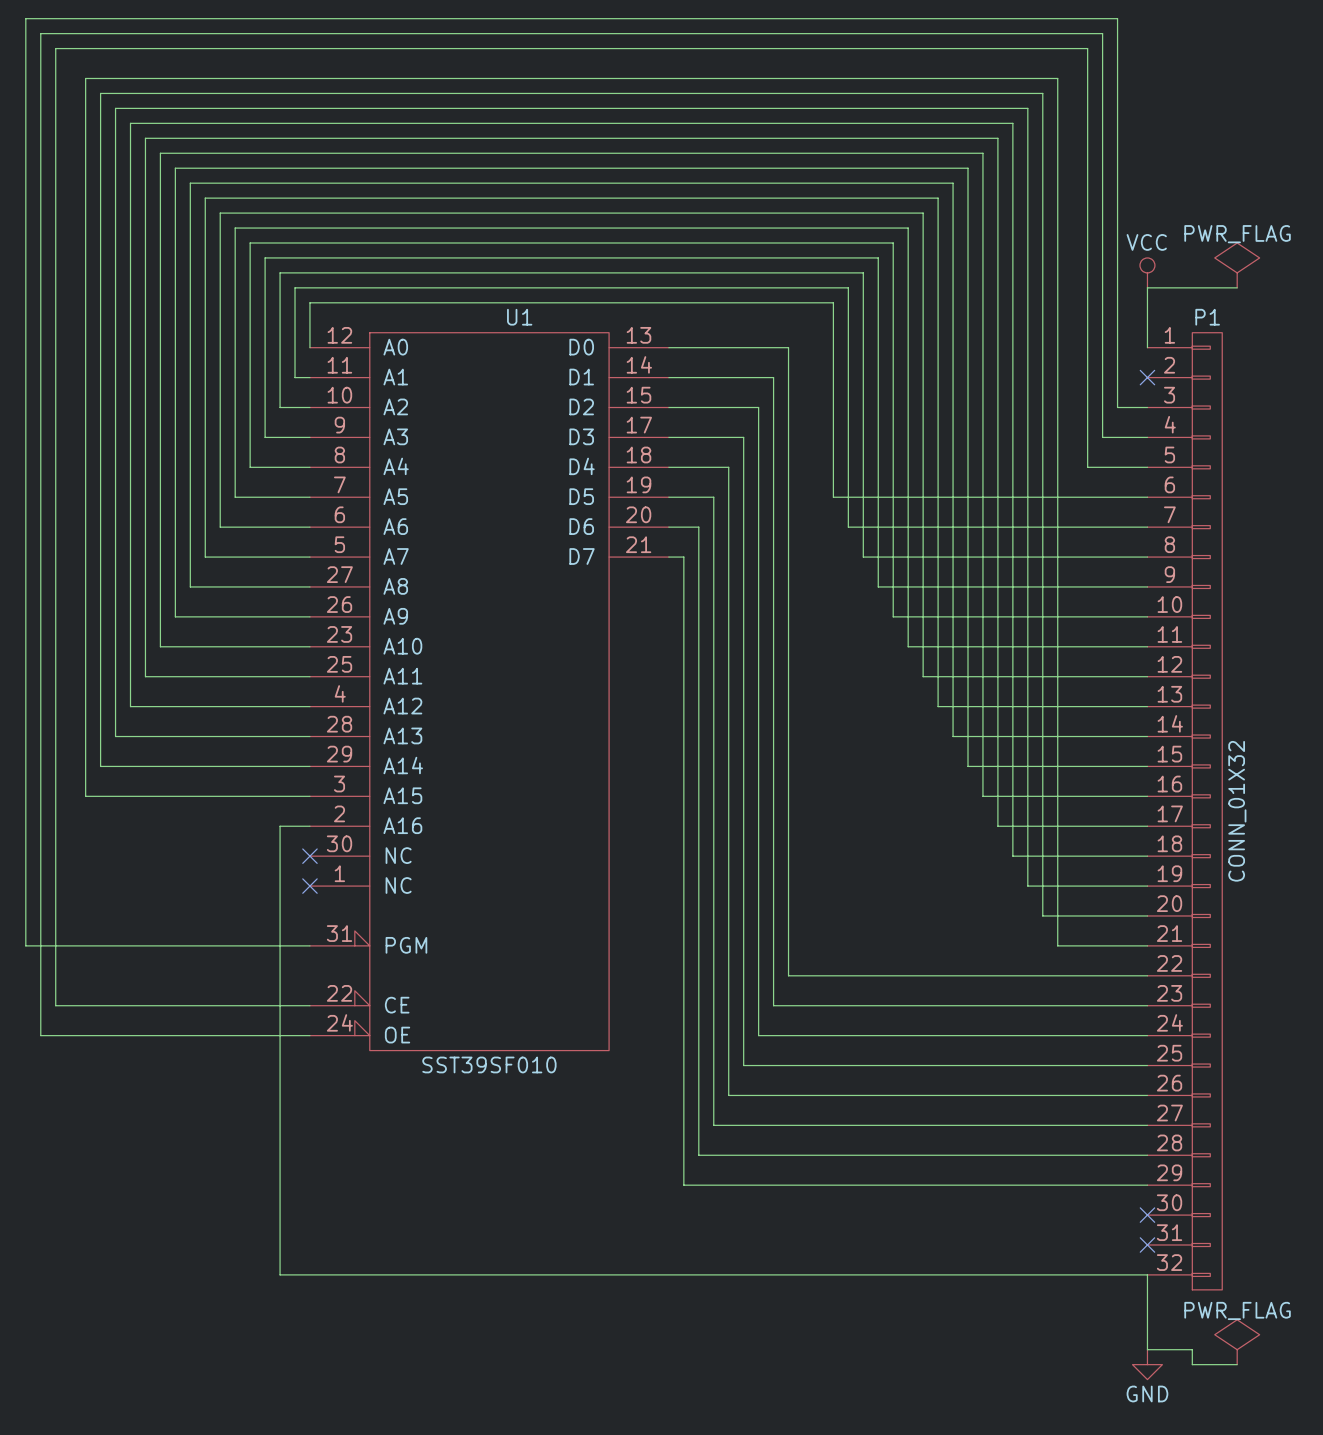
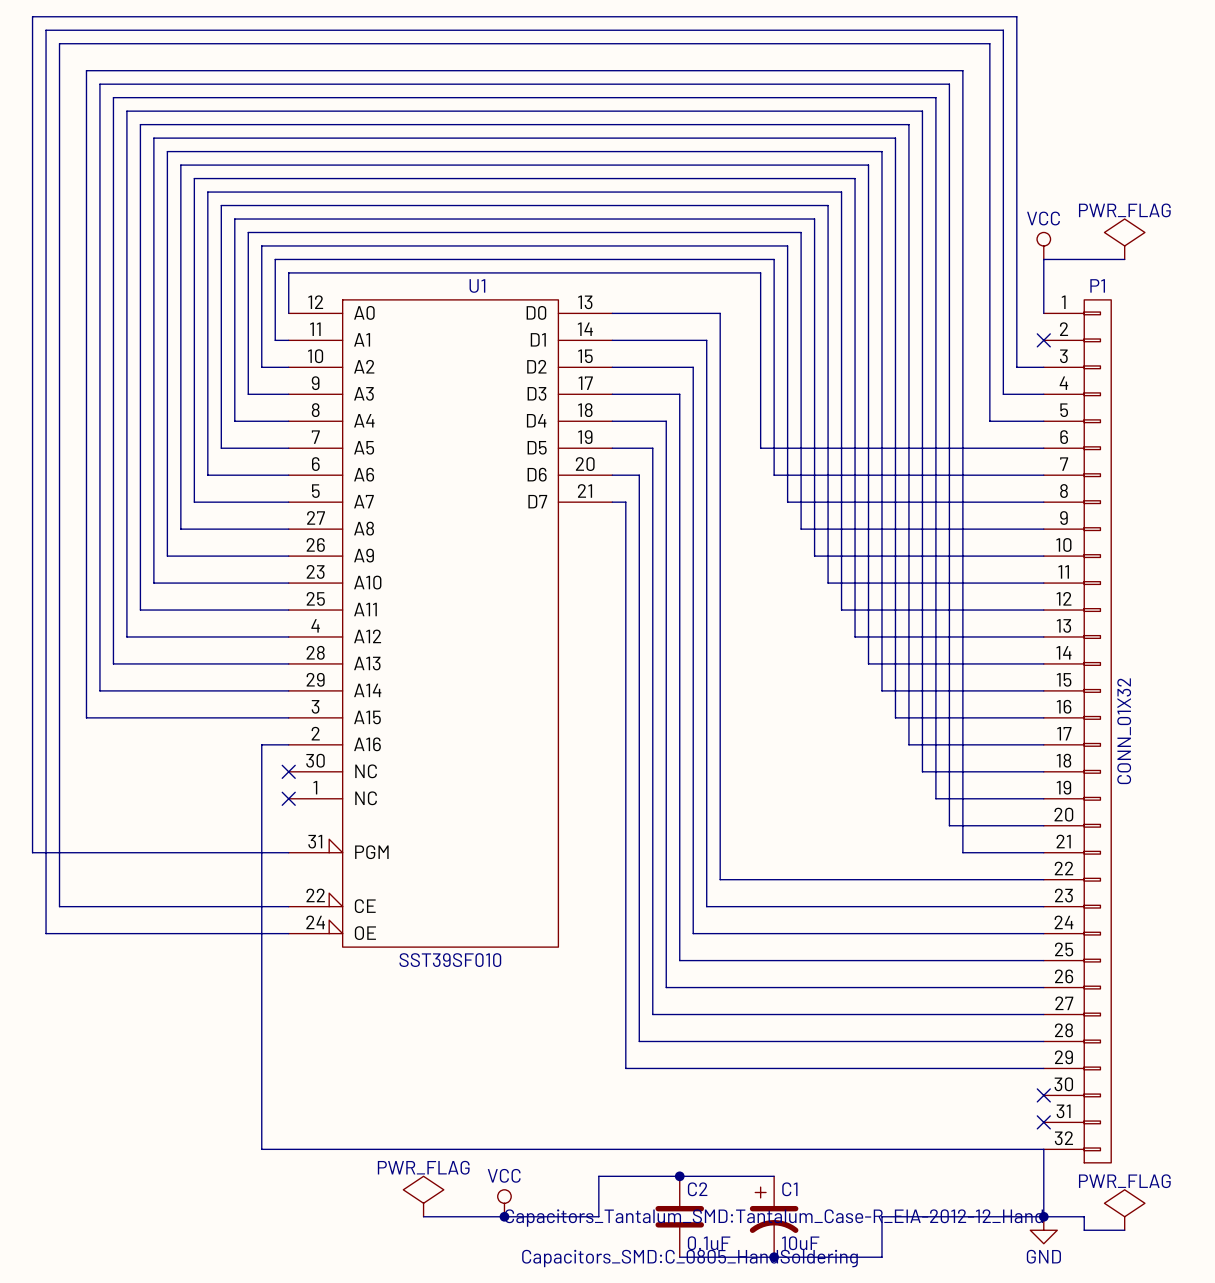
junction: none -> (679, 1176)
wire: none -> (774, 1176) (598, 1176) (598, 1216) (423, 1216)
power symbol: none -> PWR_FLAG (423, 1196)
power symbol: none -> VCC (504, 1203)
junction: none -> (504, 1216)
C2: none -> 0.1uF (679, 1216)
C1: none -> 10uF (774, 1216)
wire: none -> (1043, 1216) (881, 1216) (881, 1257) (679, 1257)
junction: none -> (1043, 1216)
junction: none -> (774, 1257)

